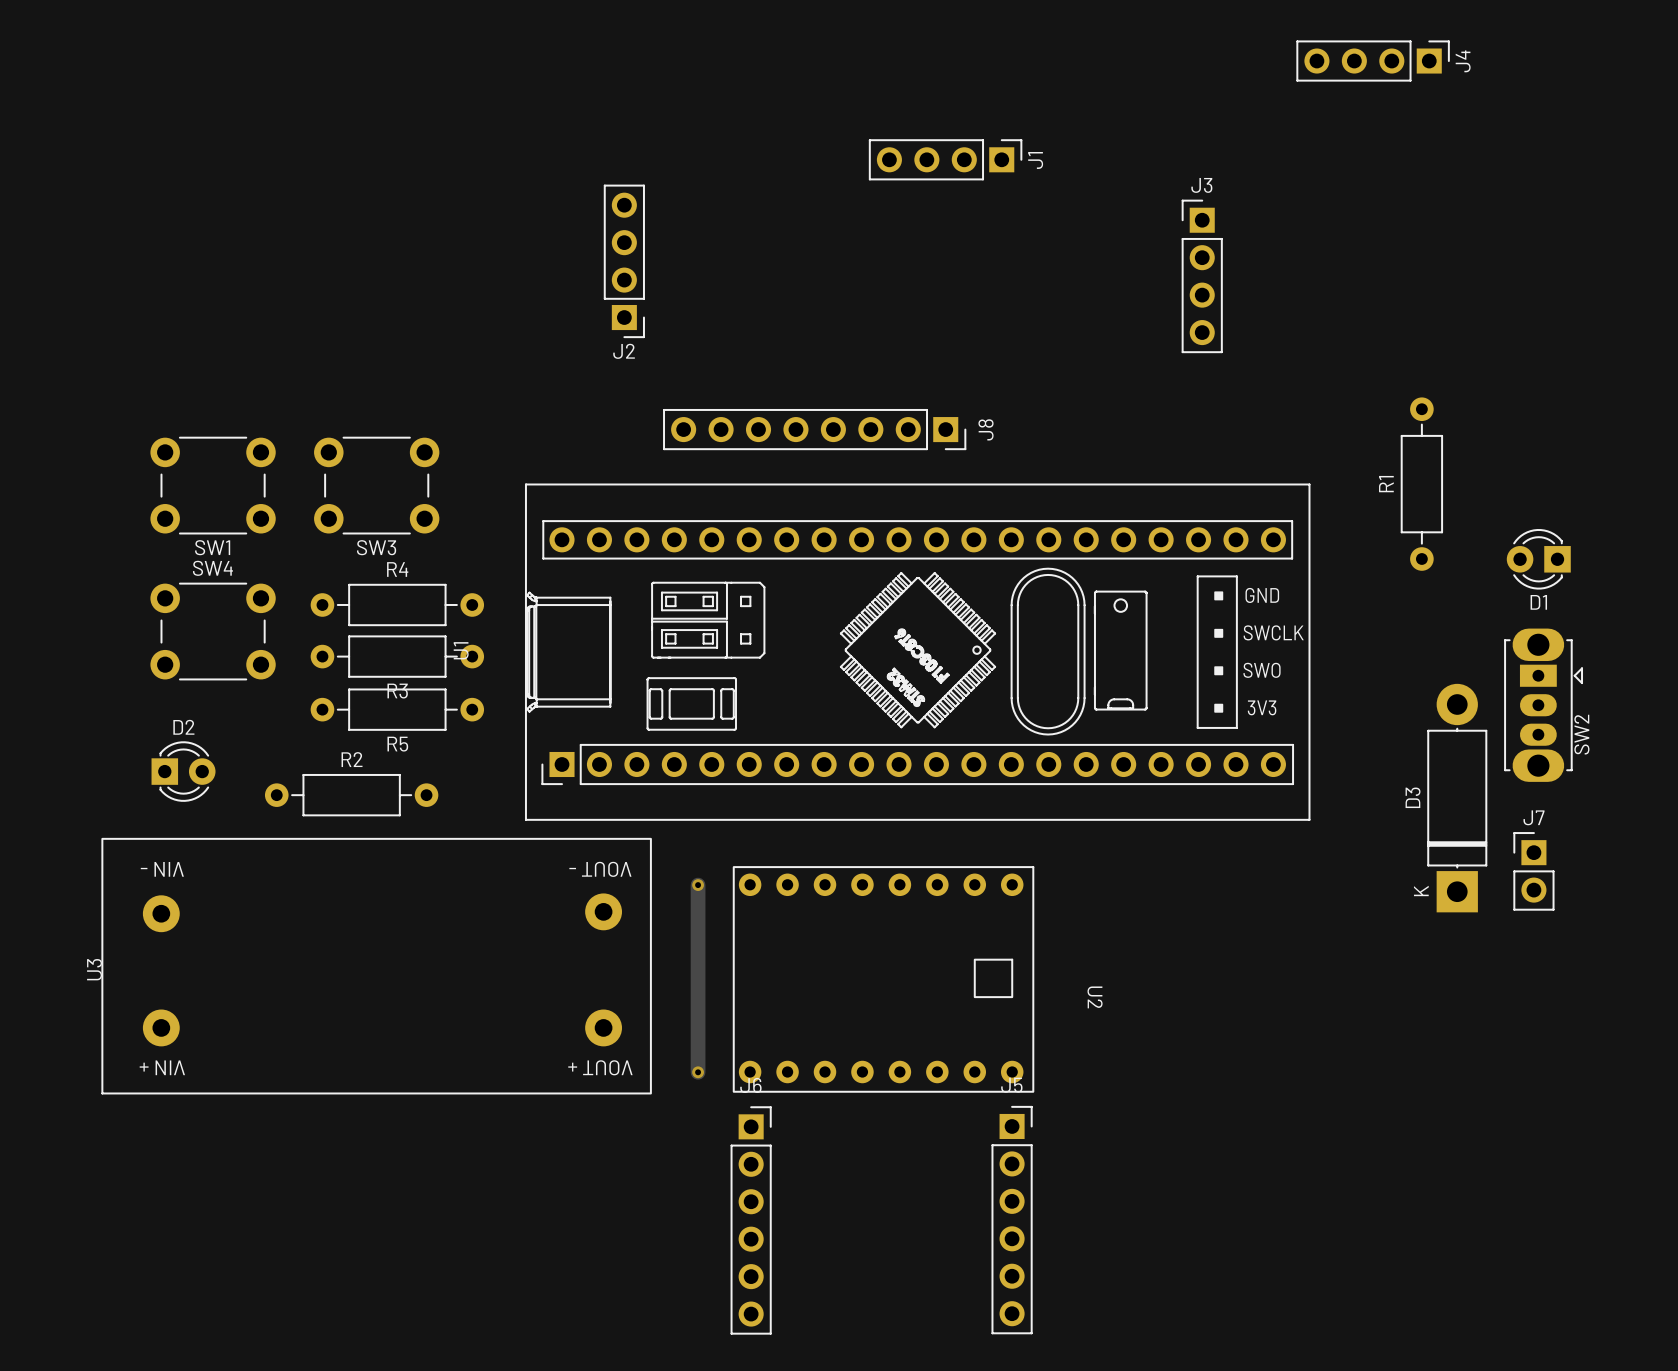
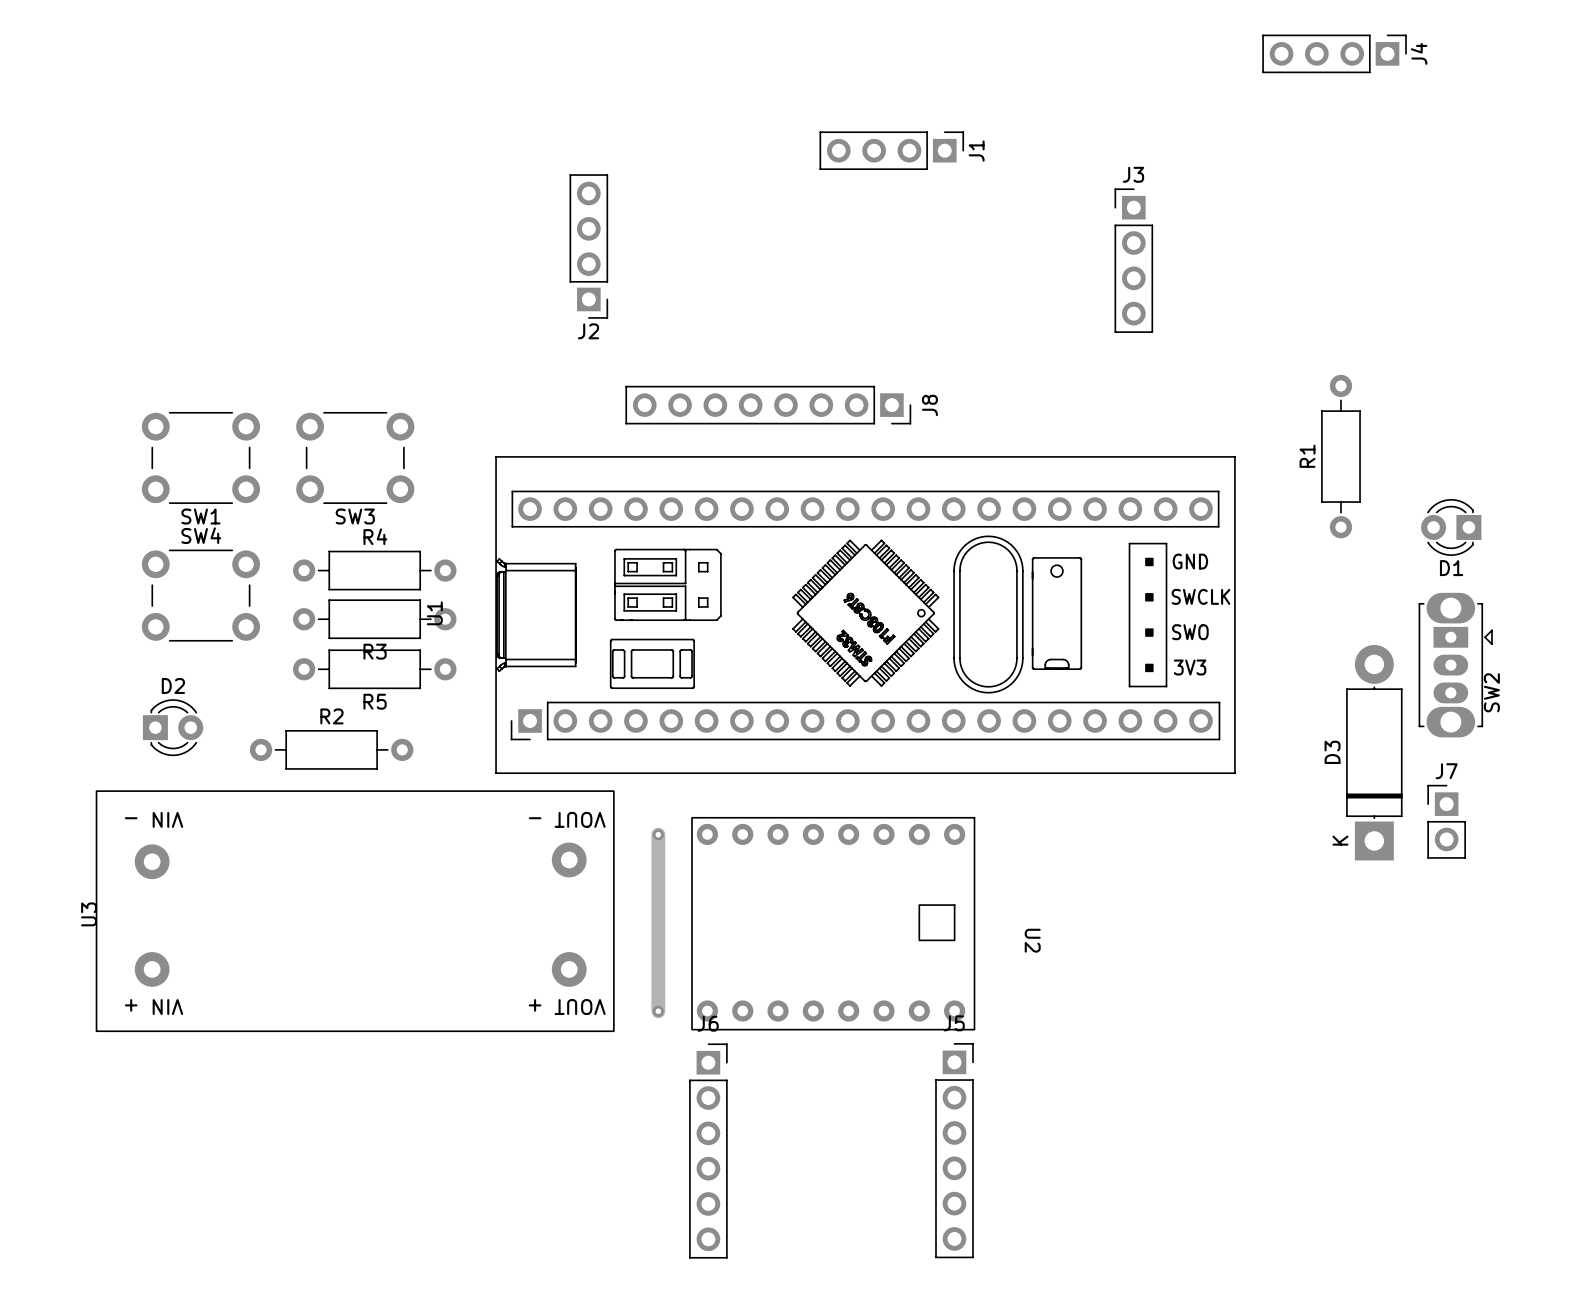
J4 position: (1373, 61) -> (1334, 53)

